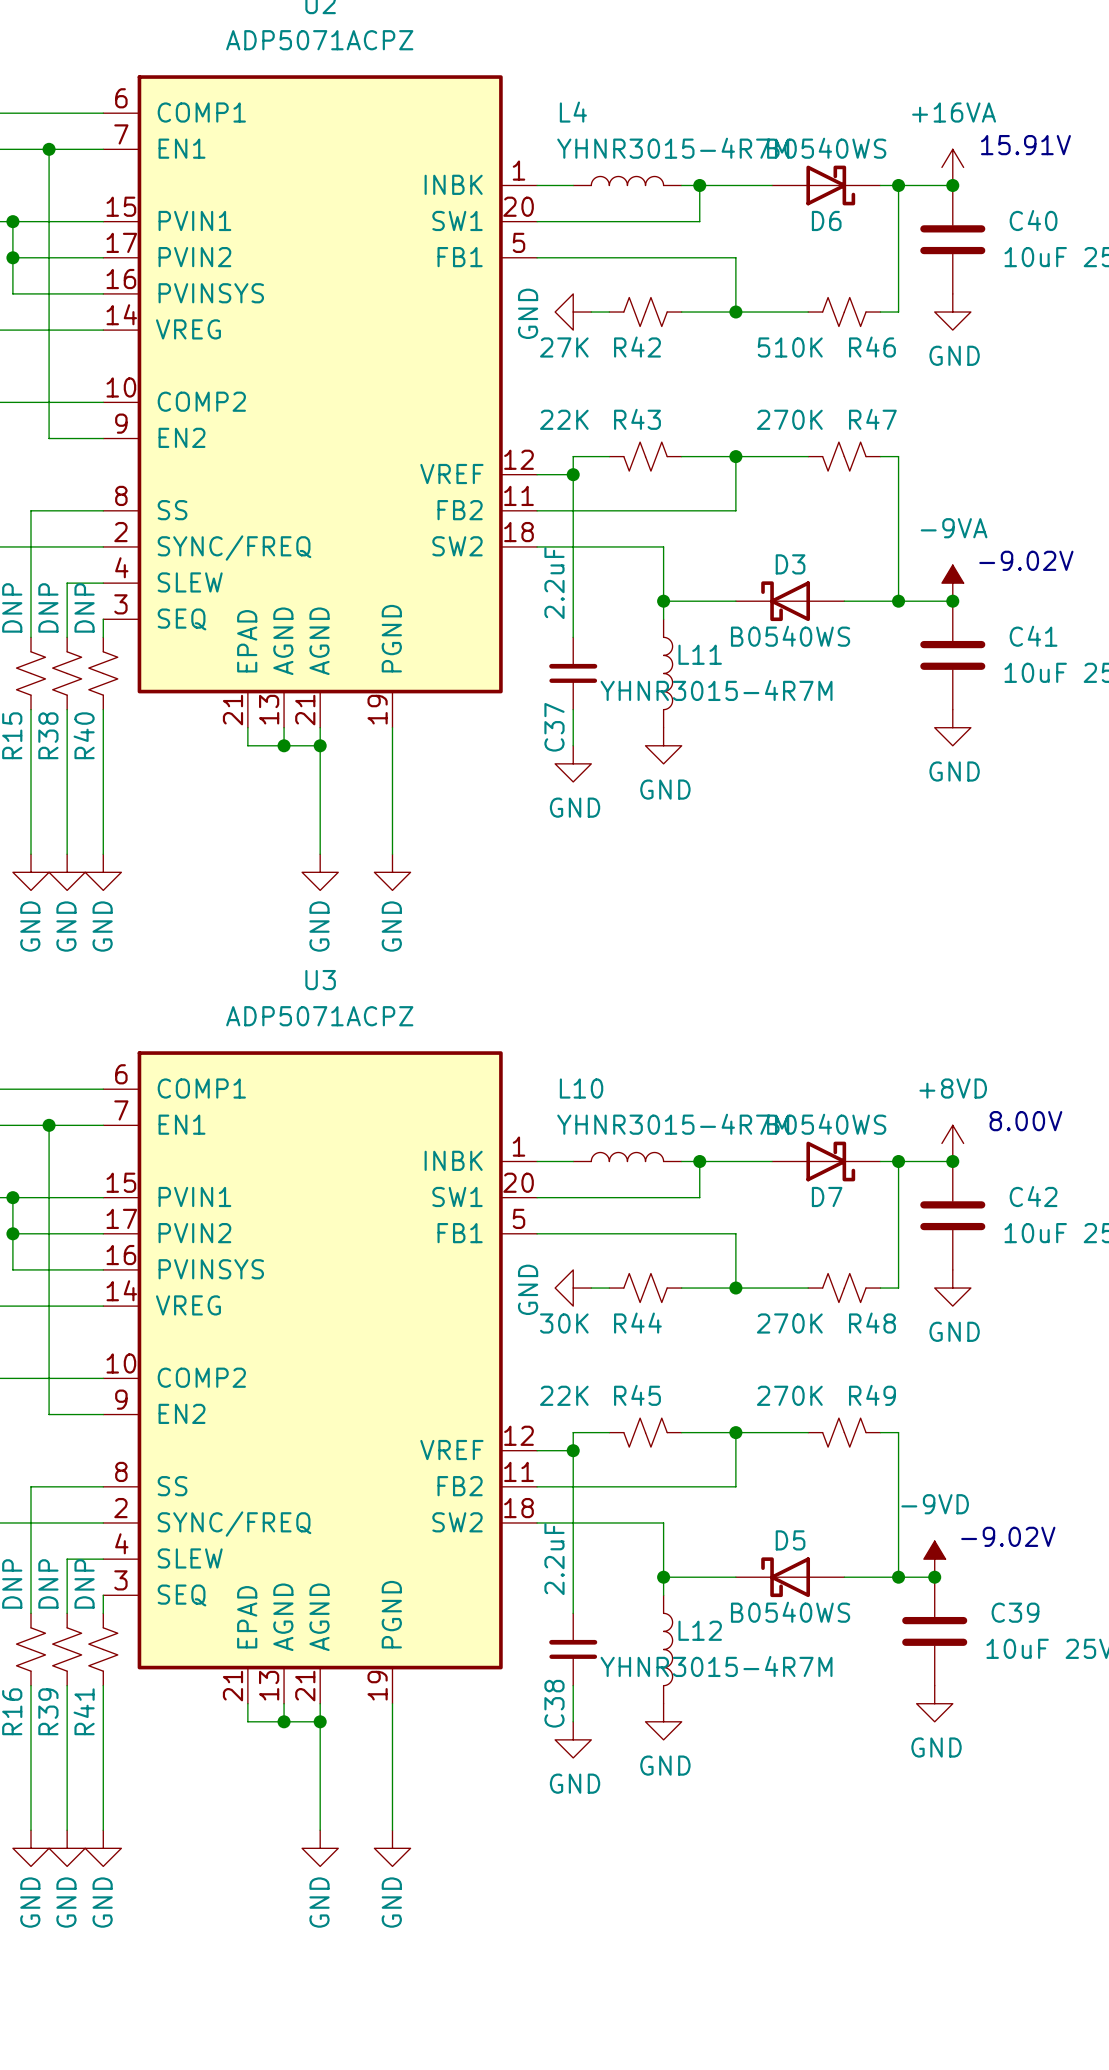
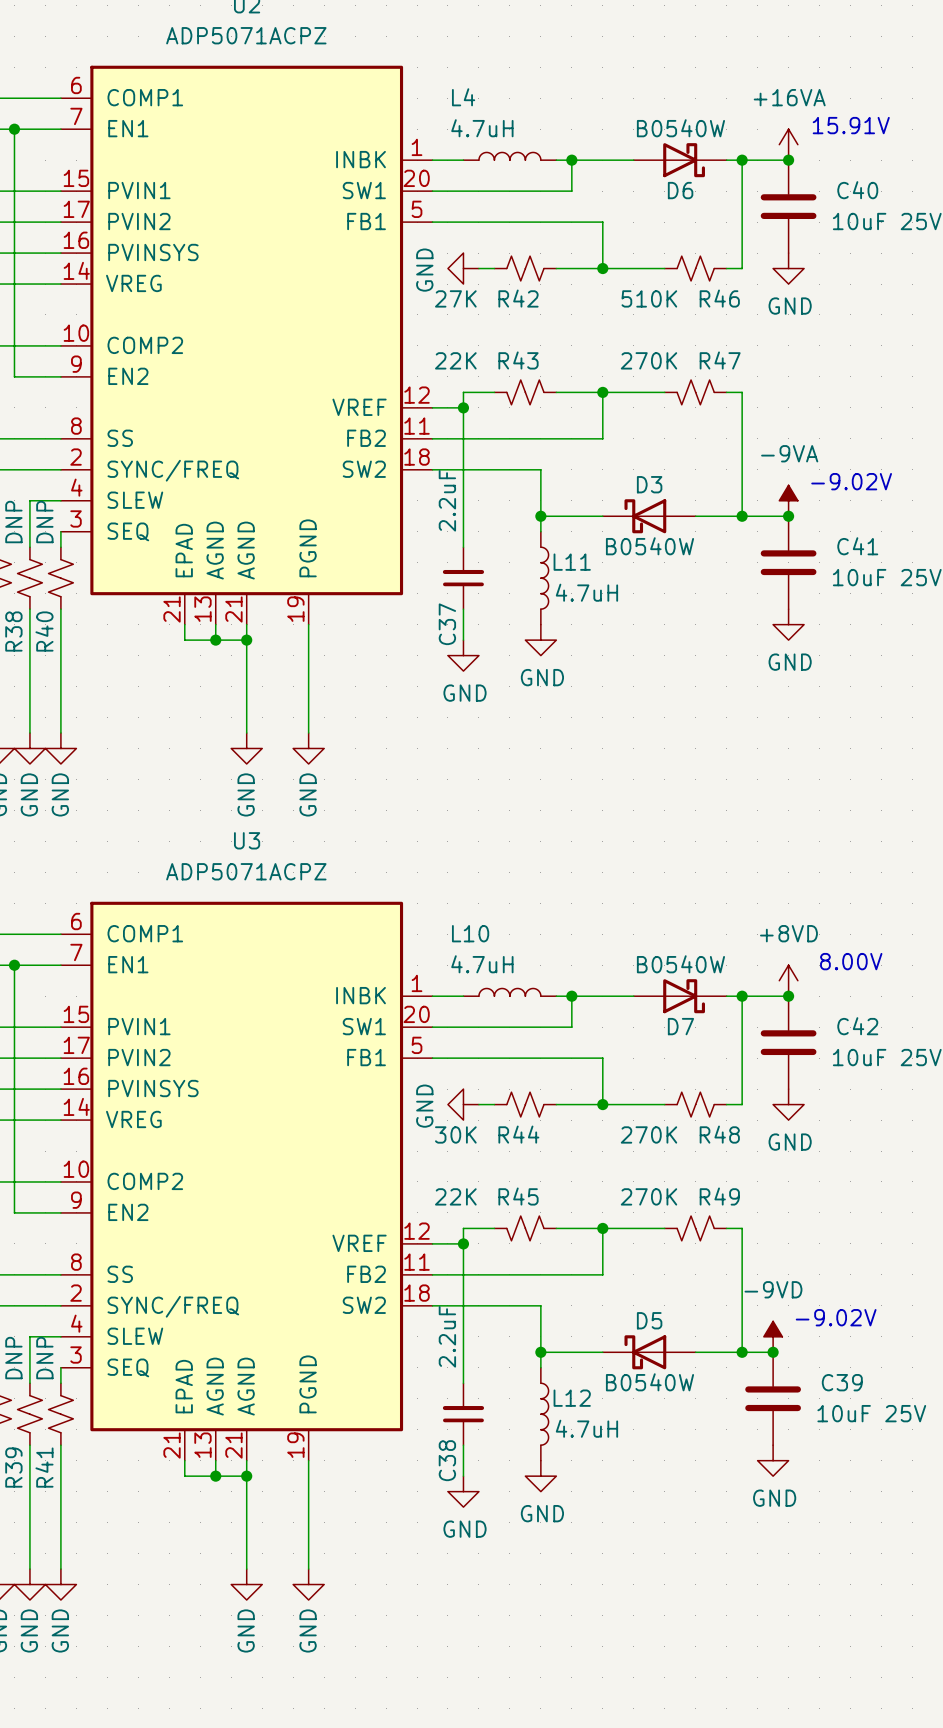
L4 value: YHNR3015-4R7M (673, 148) -> 4.7uH (482, 128)
D6 value: B0540WS (826, 148) -> B0540W (680, 128)
D3 value: B0540WS (790, 636) -> B0540W (649, 546)
L11 value: YHNR3015-4R7M (716, 690) -> 4.7uH (586, 592)
L10 value: YHNR3015-4R7M (673, 1124) -> 4.7uH (482, 964)
D7 value: B0540WS (826, 1124) -> B0540W (680, 964)
D5 value: B0540WS (790, 1612) -> B0540W (649, 1382)
L12 value: YHNR3015-4R7M (716, 1666) -> 4.7uH (586, 1428)

